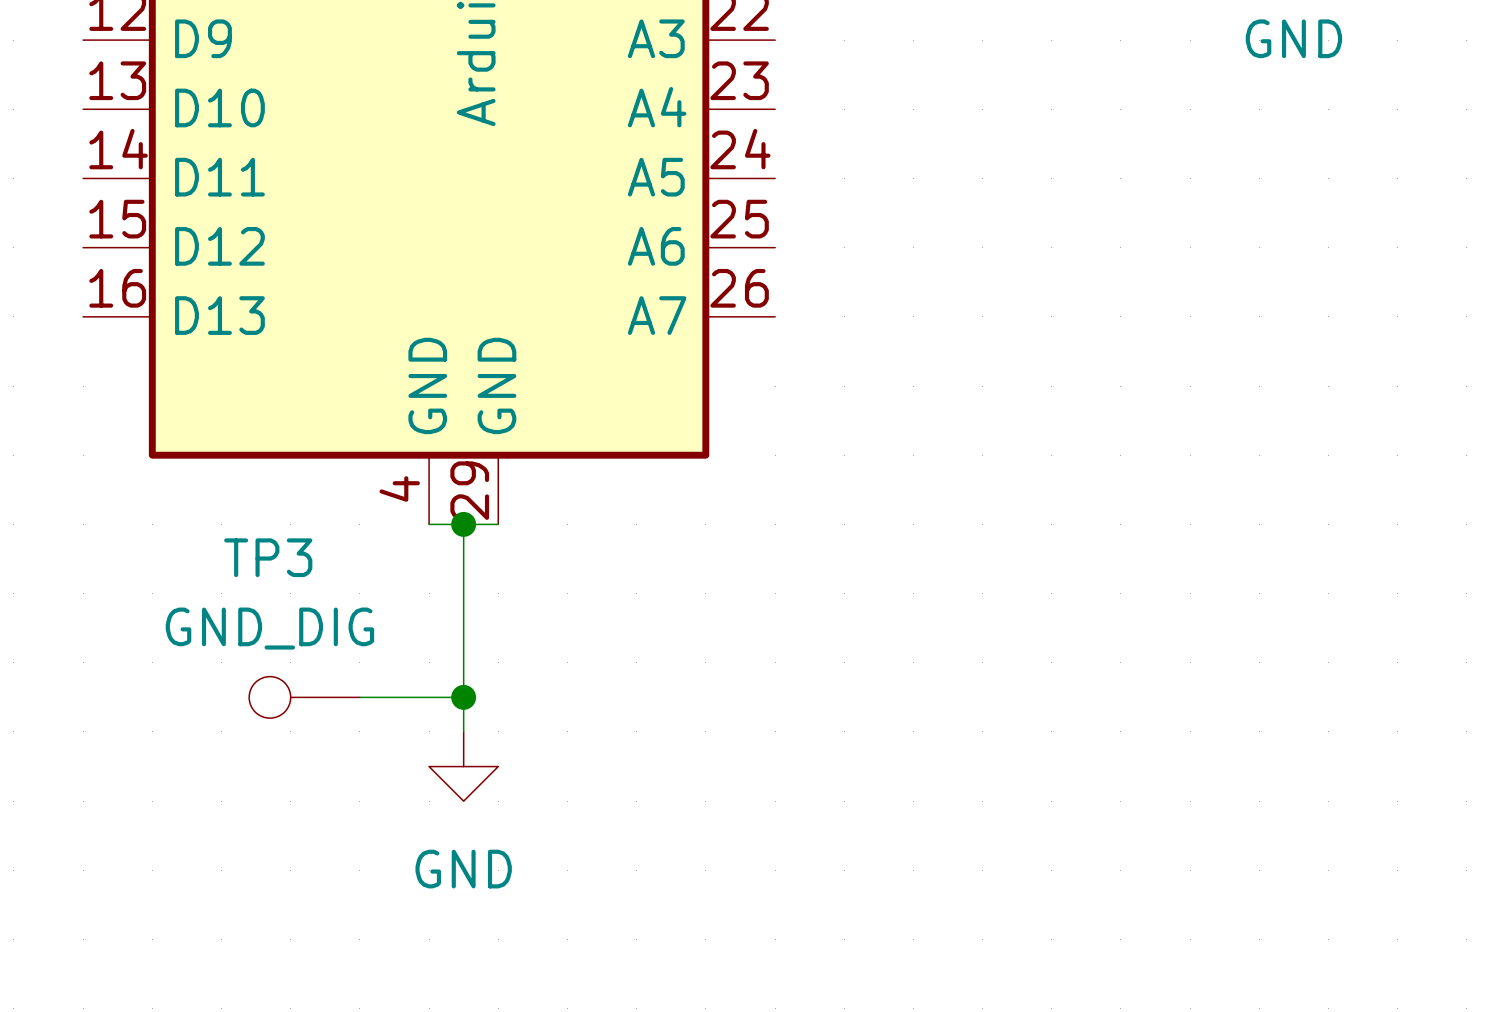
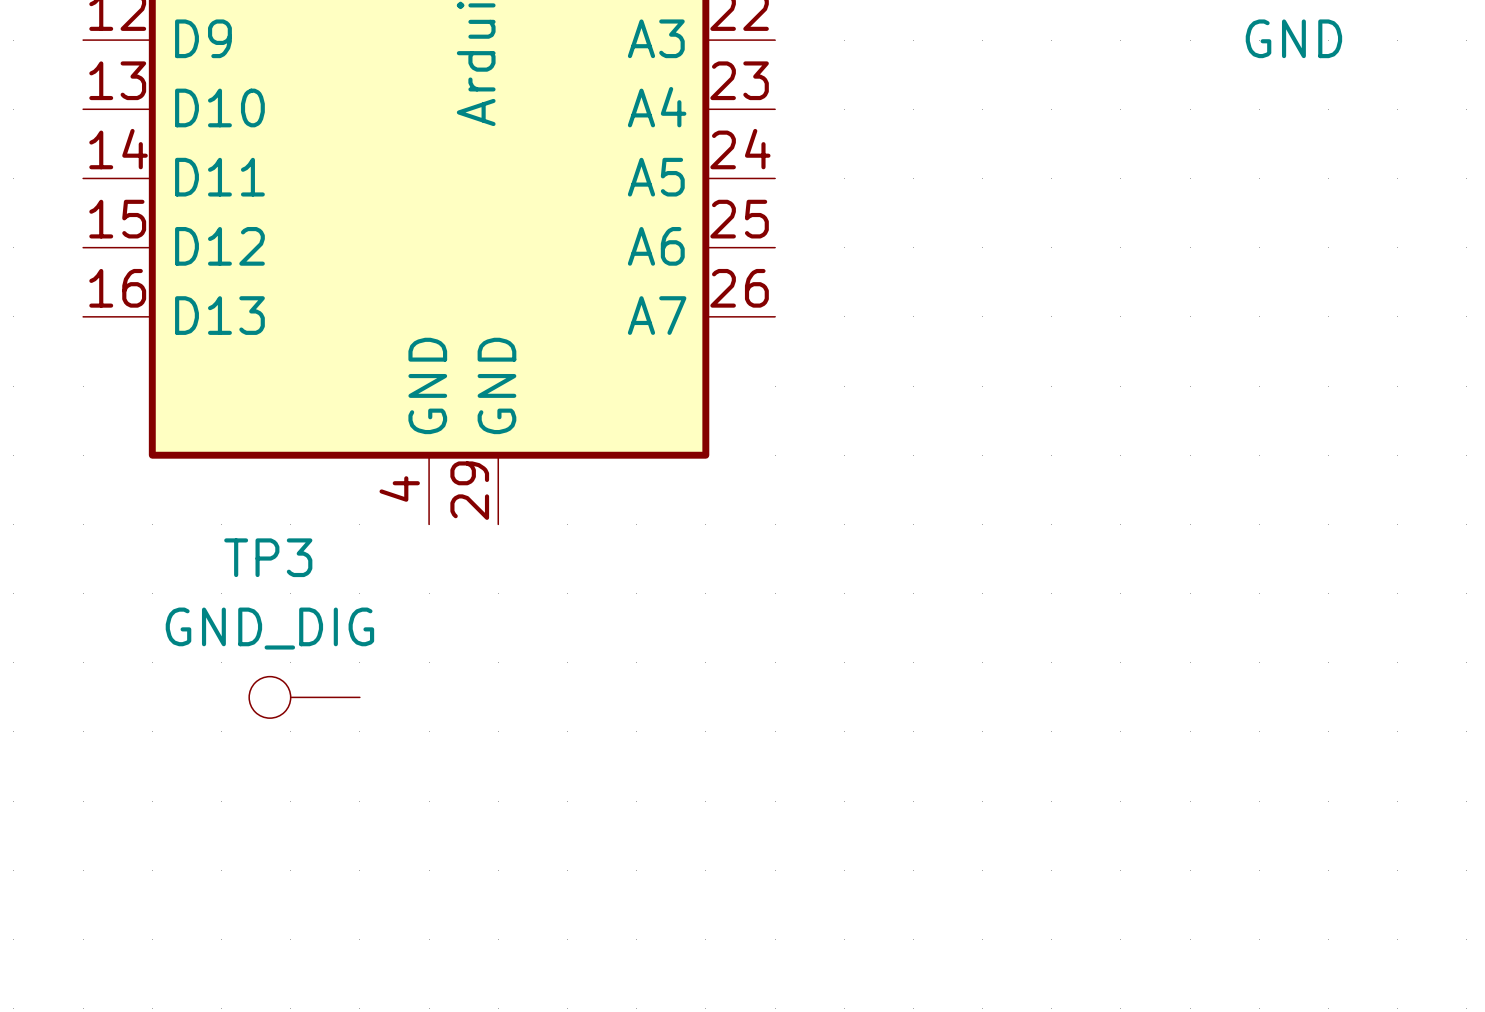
wire: (429, 524) (498, 524) -> none
wire: (463, 524) (463, 731) -> none
junction: (463, 524) -> none
wire: (359, 697) (463, 697) -> none
junction: (463, 697) -> none
power symbol: GND (463, 766) -> none

